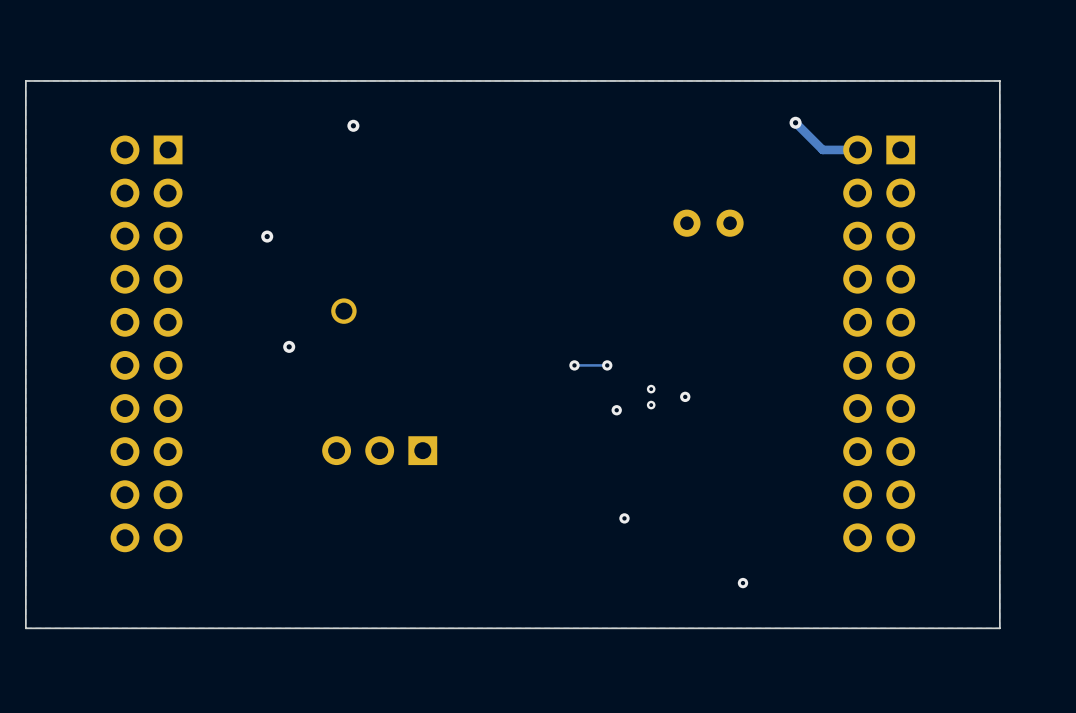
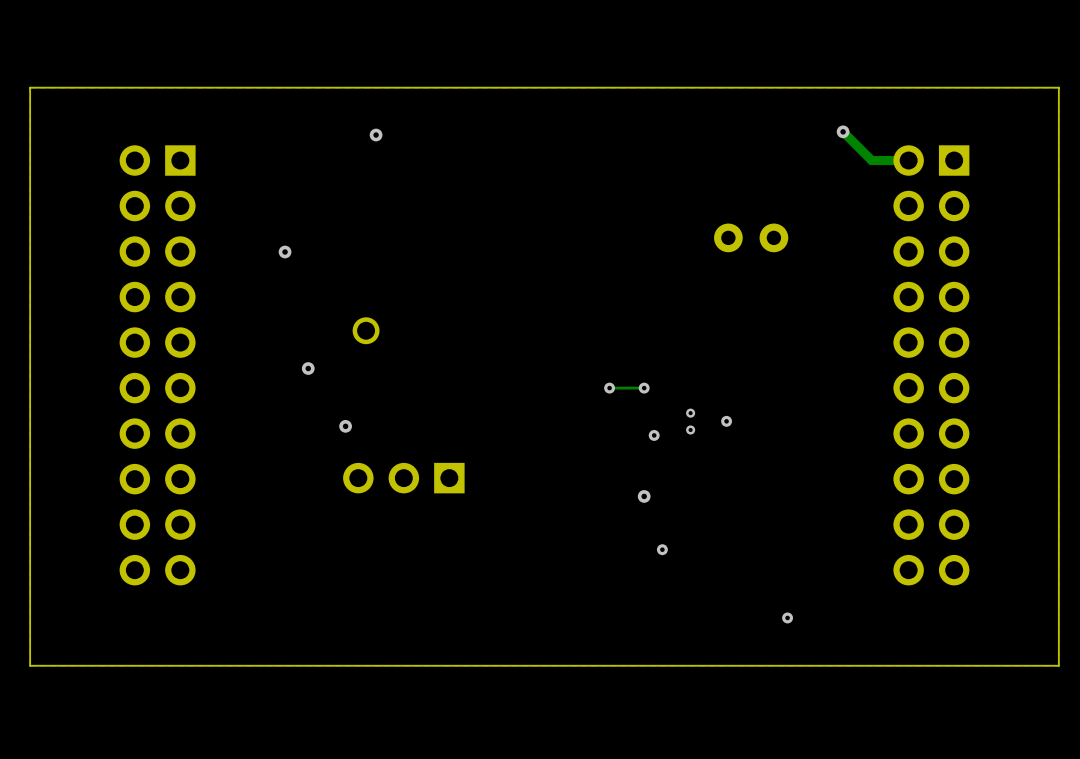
via: none -> (345, 426)
via: none -> (644, 496)

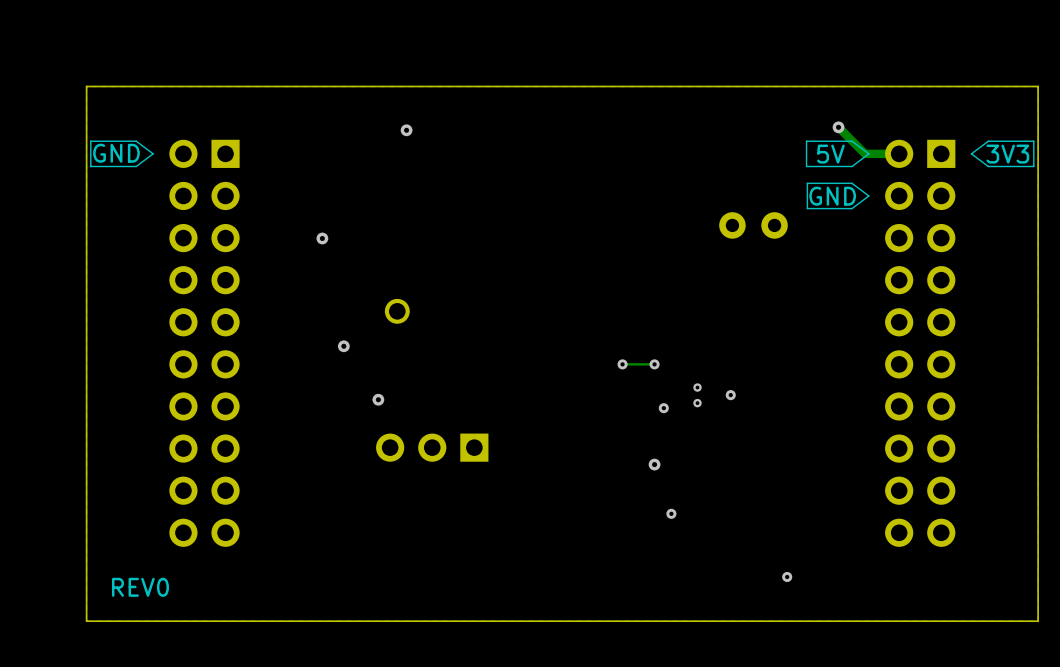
line: none -> (136, 141) (90, 141) (90, 166) (136, 166) (153, 153) (136, 141)
line: none -> (852, 141) (806, 141) (806, 166) (852, 166) (868, 153) (852, 141)
line: none -> (1033, 141) (988, 141) (971, 153) (988, 166) (1033, 166) (1033, 141)
text: none -> GND (116, 153)
text: none -> 5V (830, 154)
text: none -> 3V3 (1007, 154)
line: none -> (852, 183) (807, 183) (807, 208) (852, 208) (868, 195) (852, 183)
text: none -> GND (832, 196)
text: none -> REV0 (140, 587)

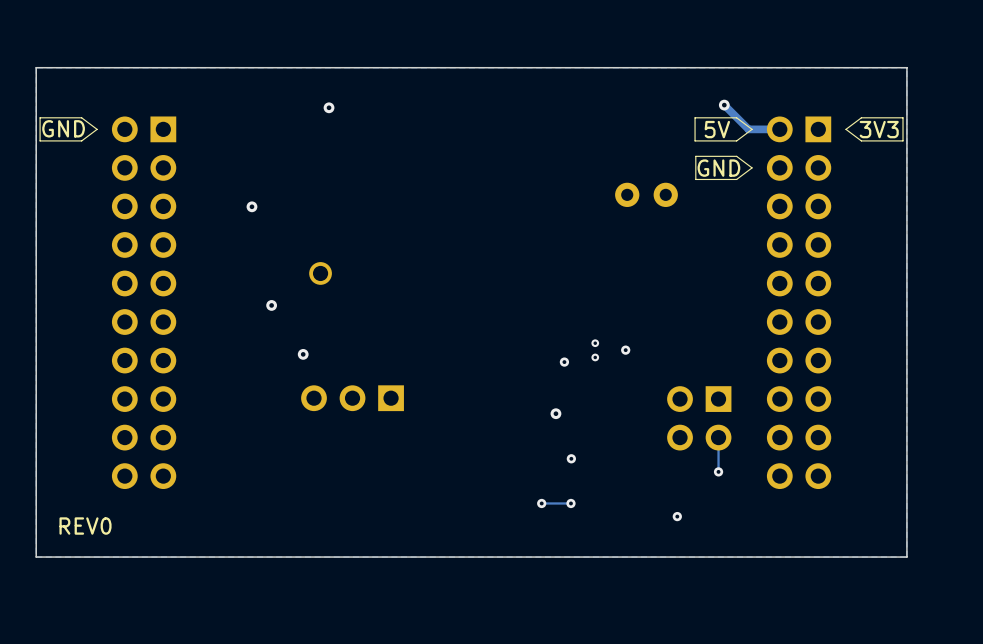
via: (622, 364) -> none
track: (654, 364) (622, 364) -> (570, 503) (541, 503)
via: (654, 364) -> none
part: none -> (699, 418)
track: none -> (718, 437) (718, 471)
via: none -> (718, 471)
via: none -> (541, 503)
via: none -> (570, 503)

